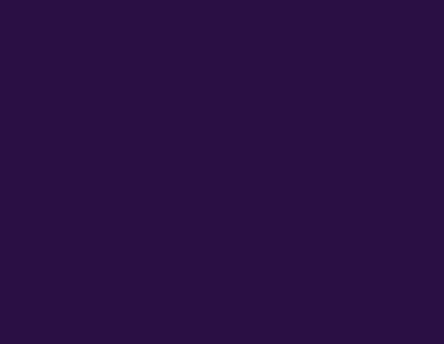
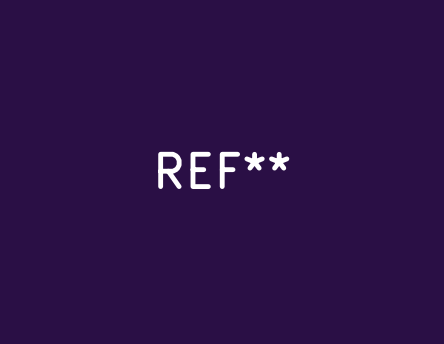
REF**: none -> (223, 170)

